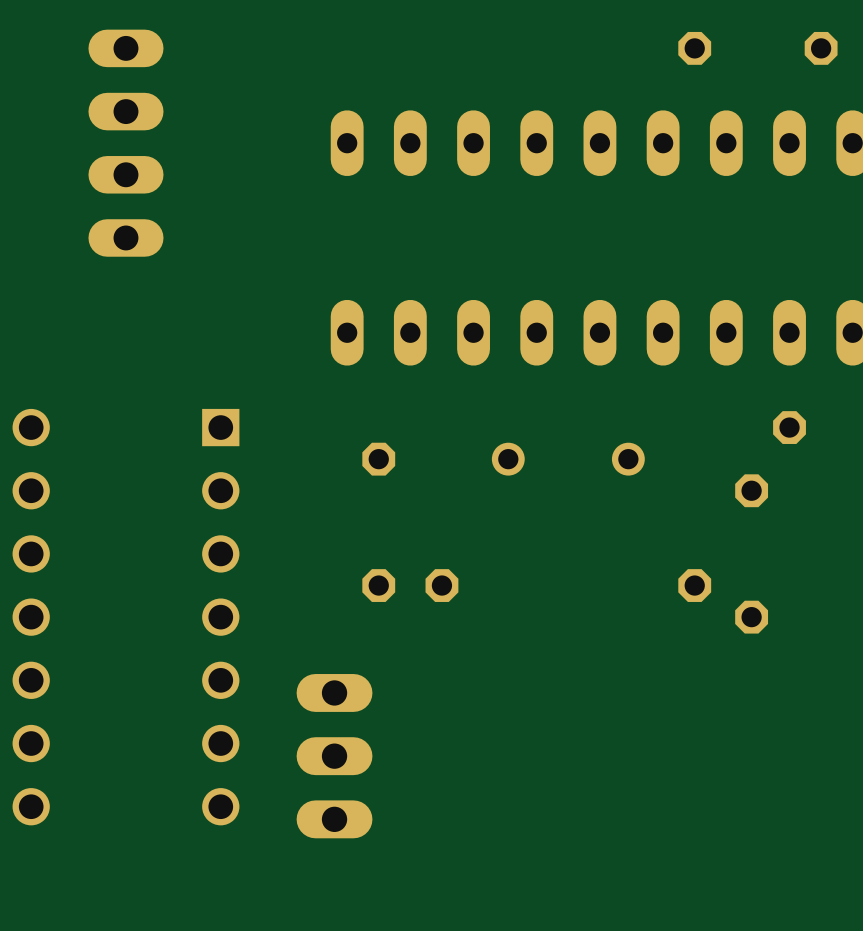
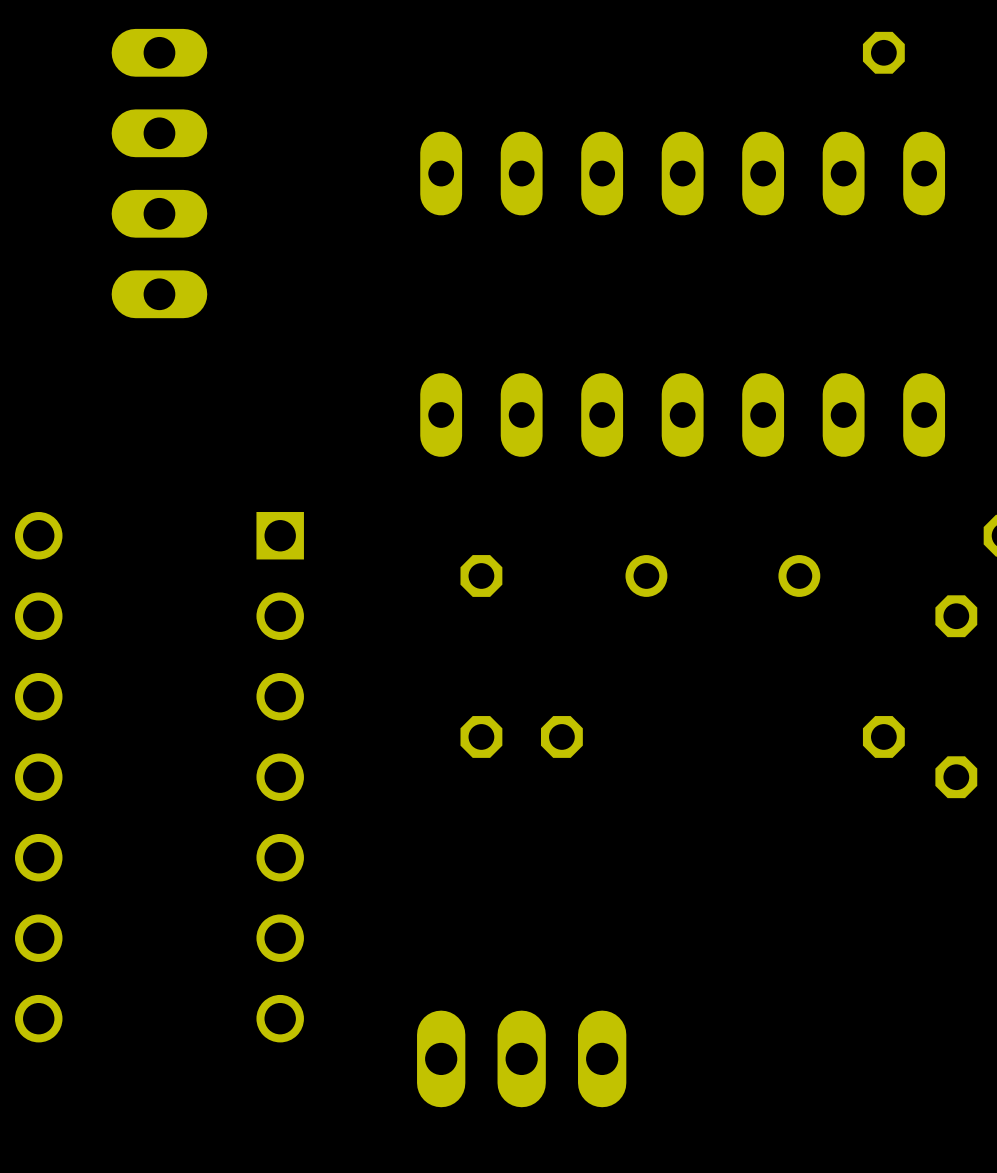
part rotation: 0° (334, 756) -> 90° clockwise (521, 1058)
part position: (334, 756) -> (521, 1058)

